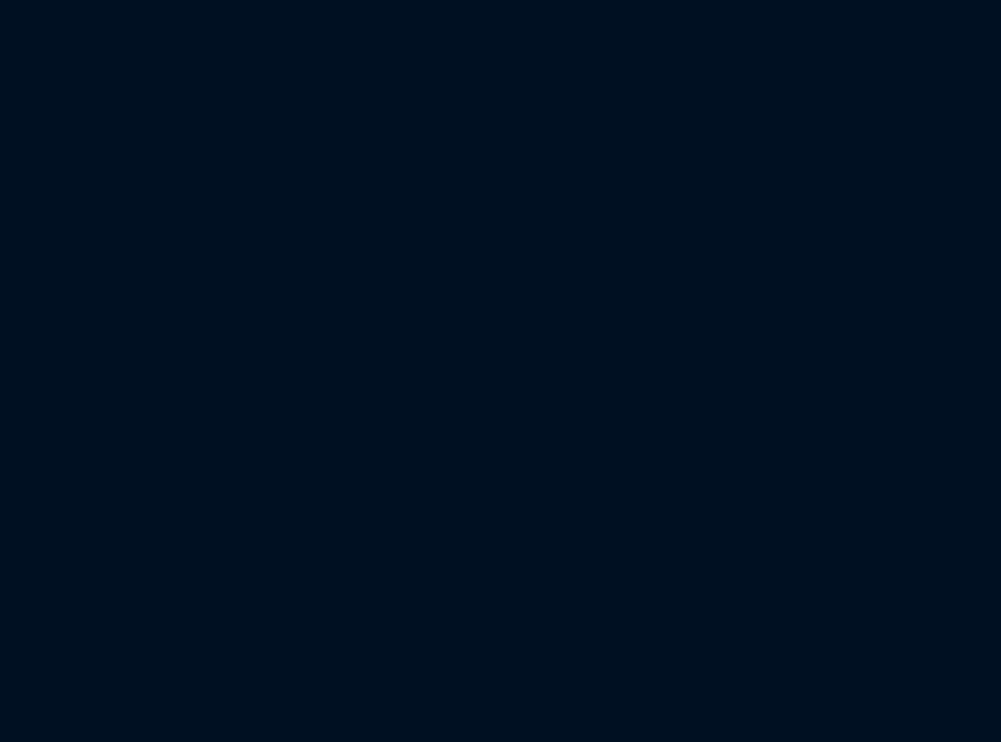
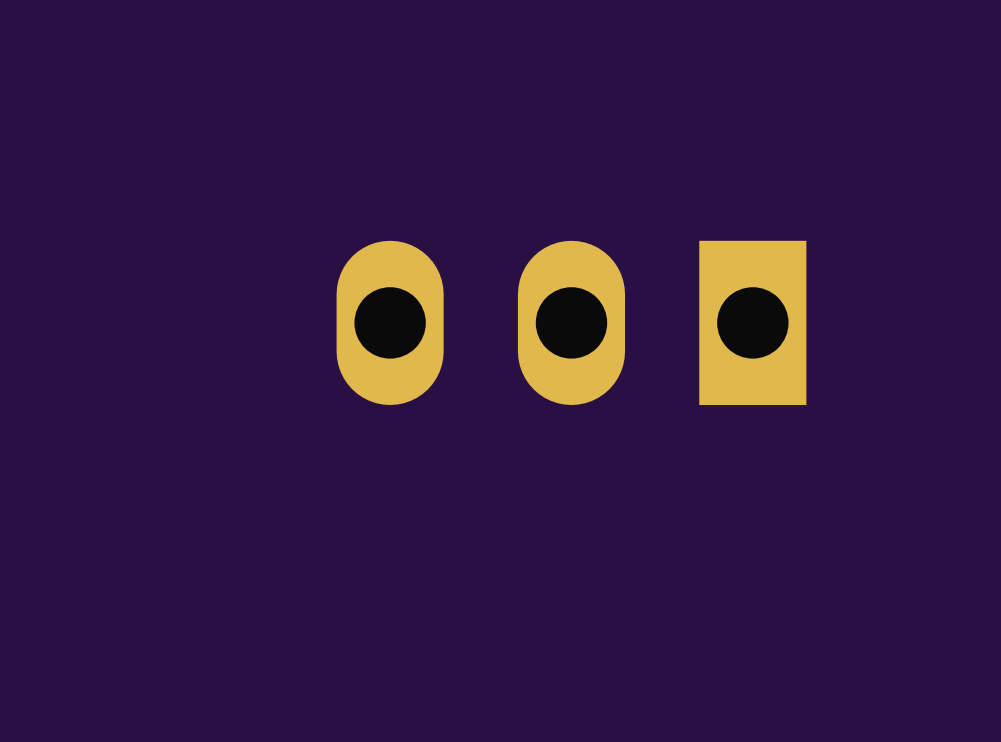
part: none -> (571, 322)

